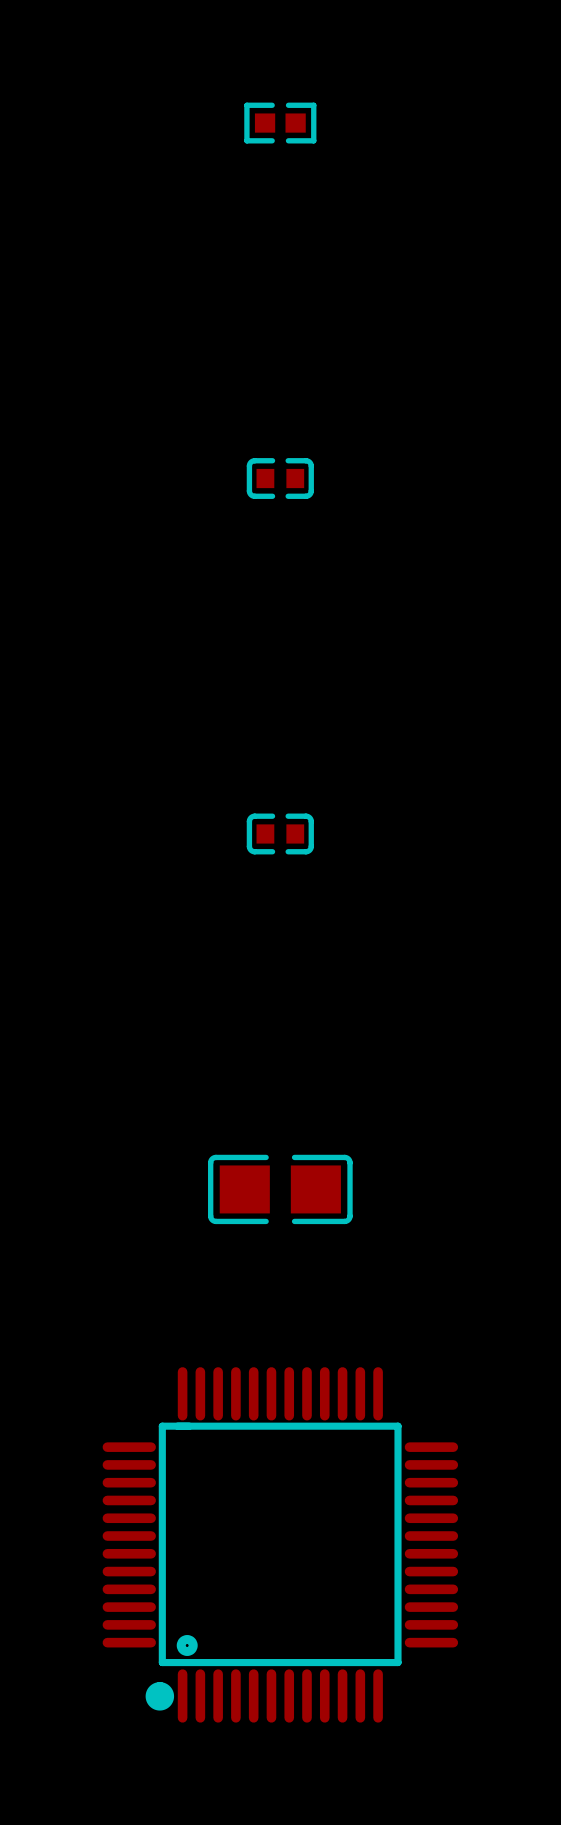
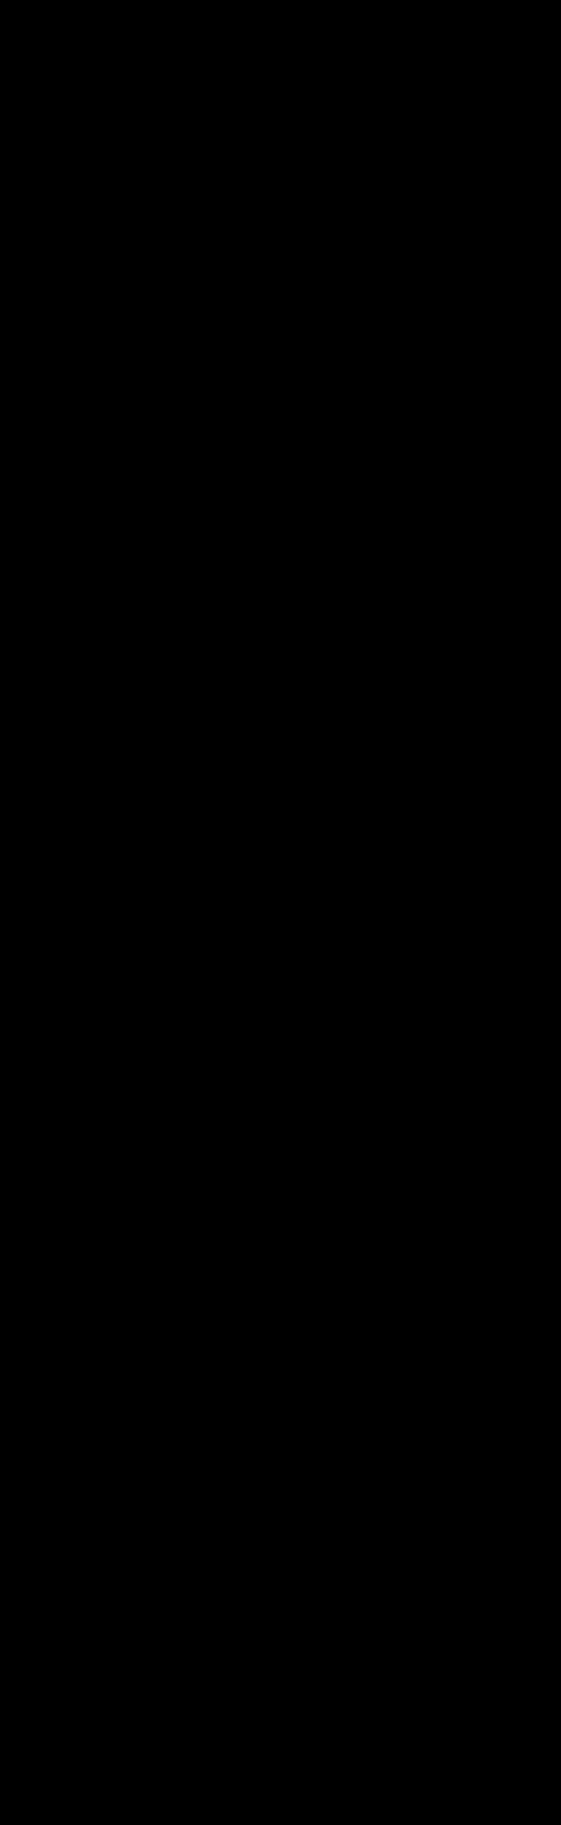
part: (280, 123) -> none
part: (280, 478) -> none
part: (280, 833) -> none
part: (280, 1189) -> none
part: (280, 1544) -> none

